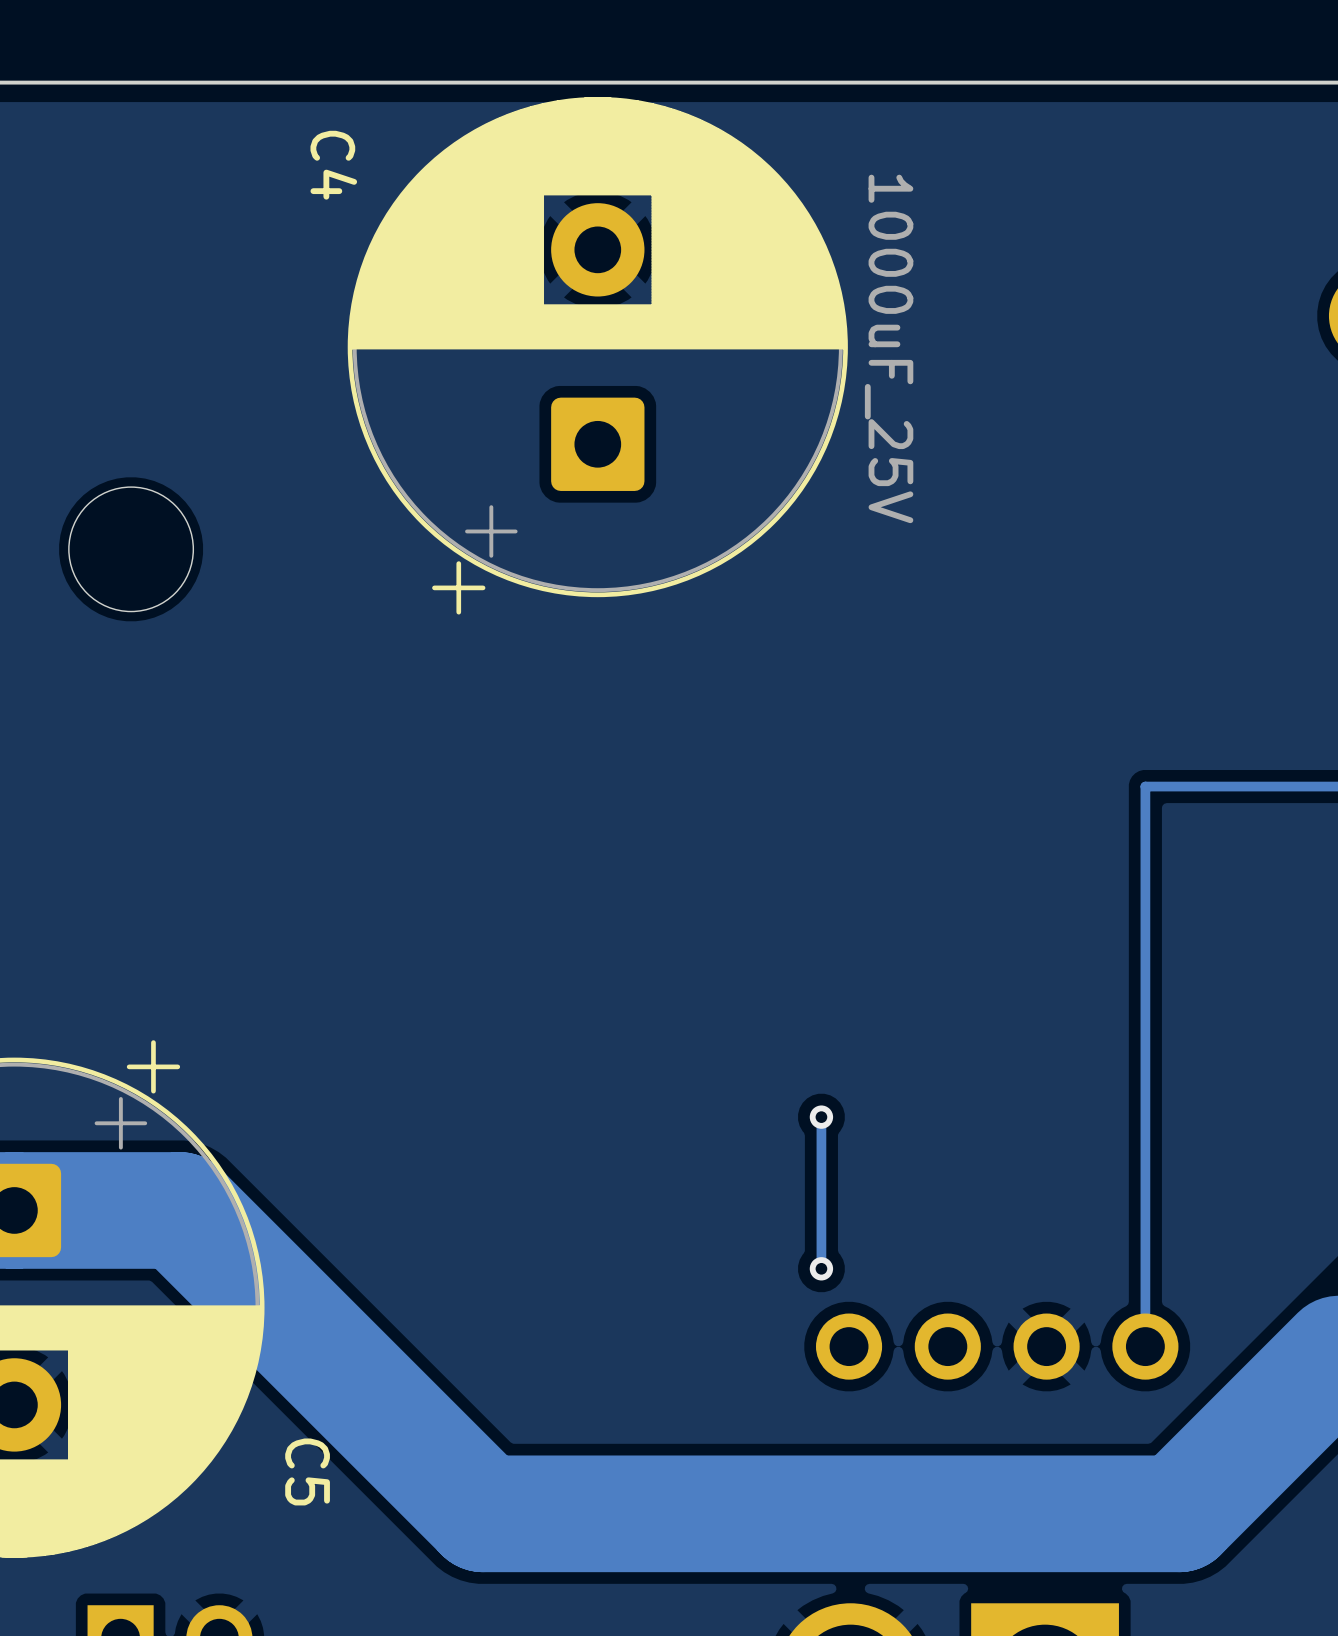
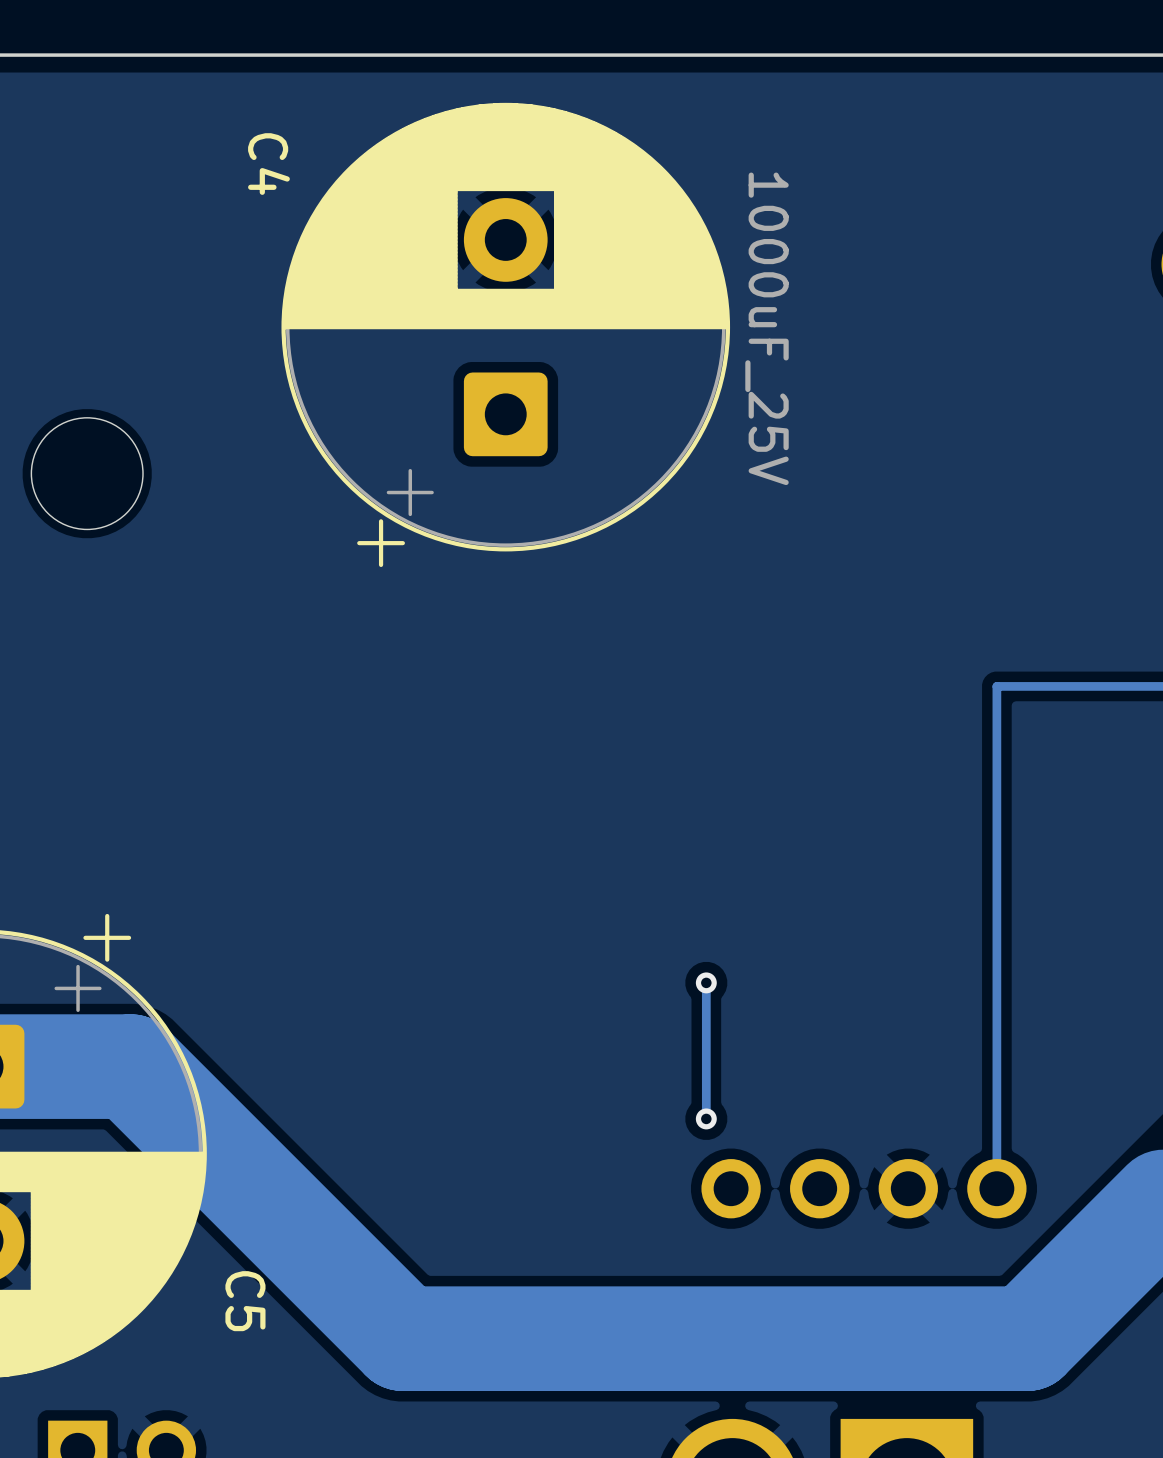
C4 position: (597, 355) -> (505, 334)

